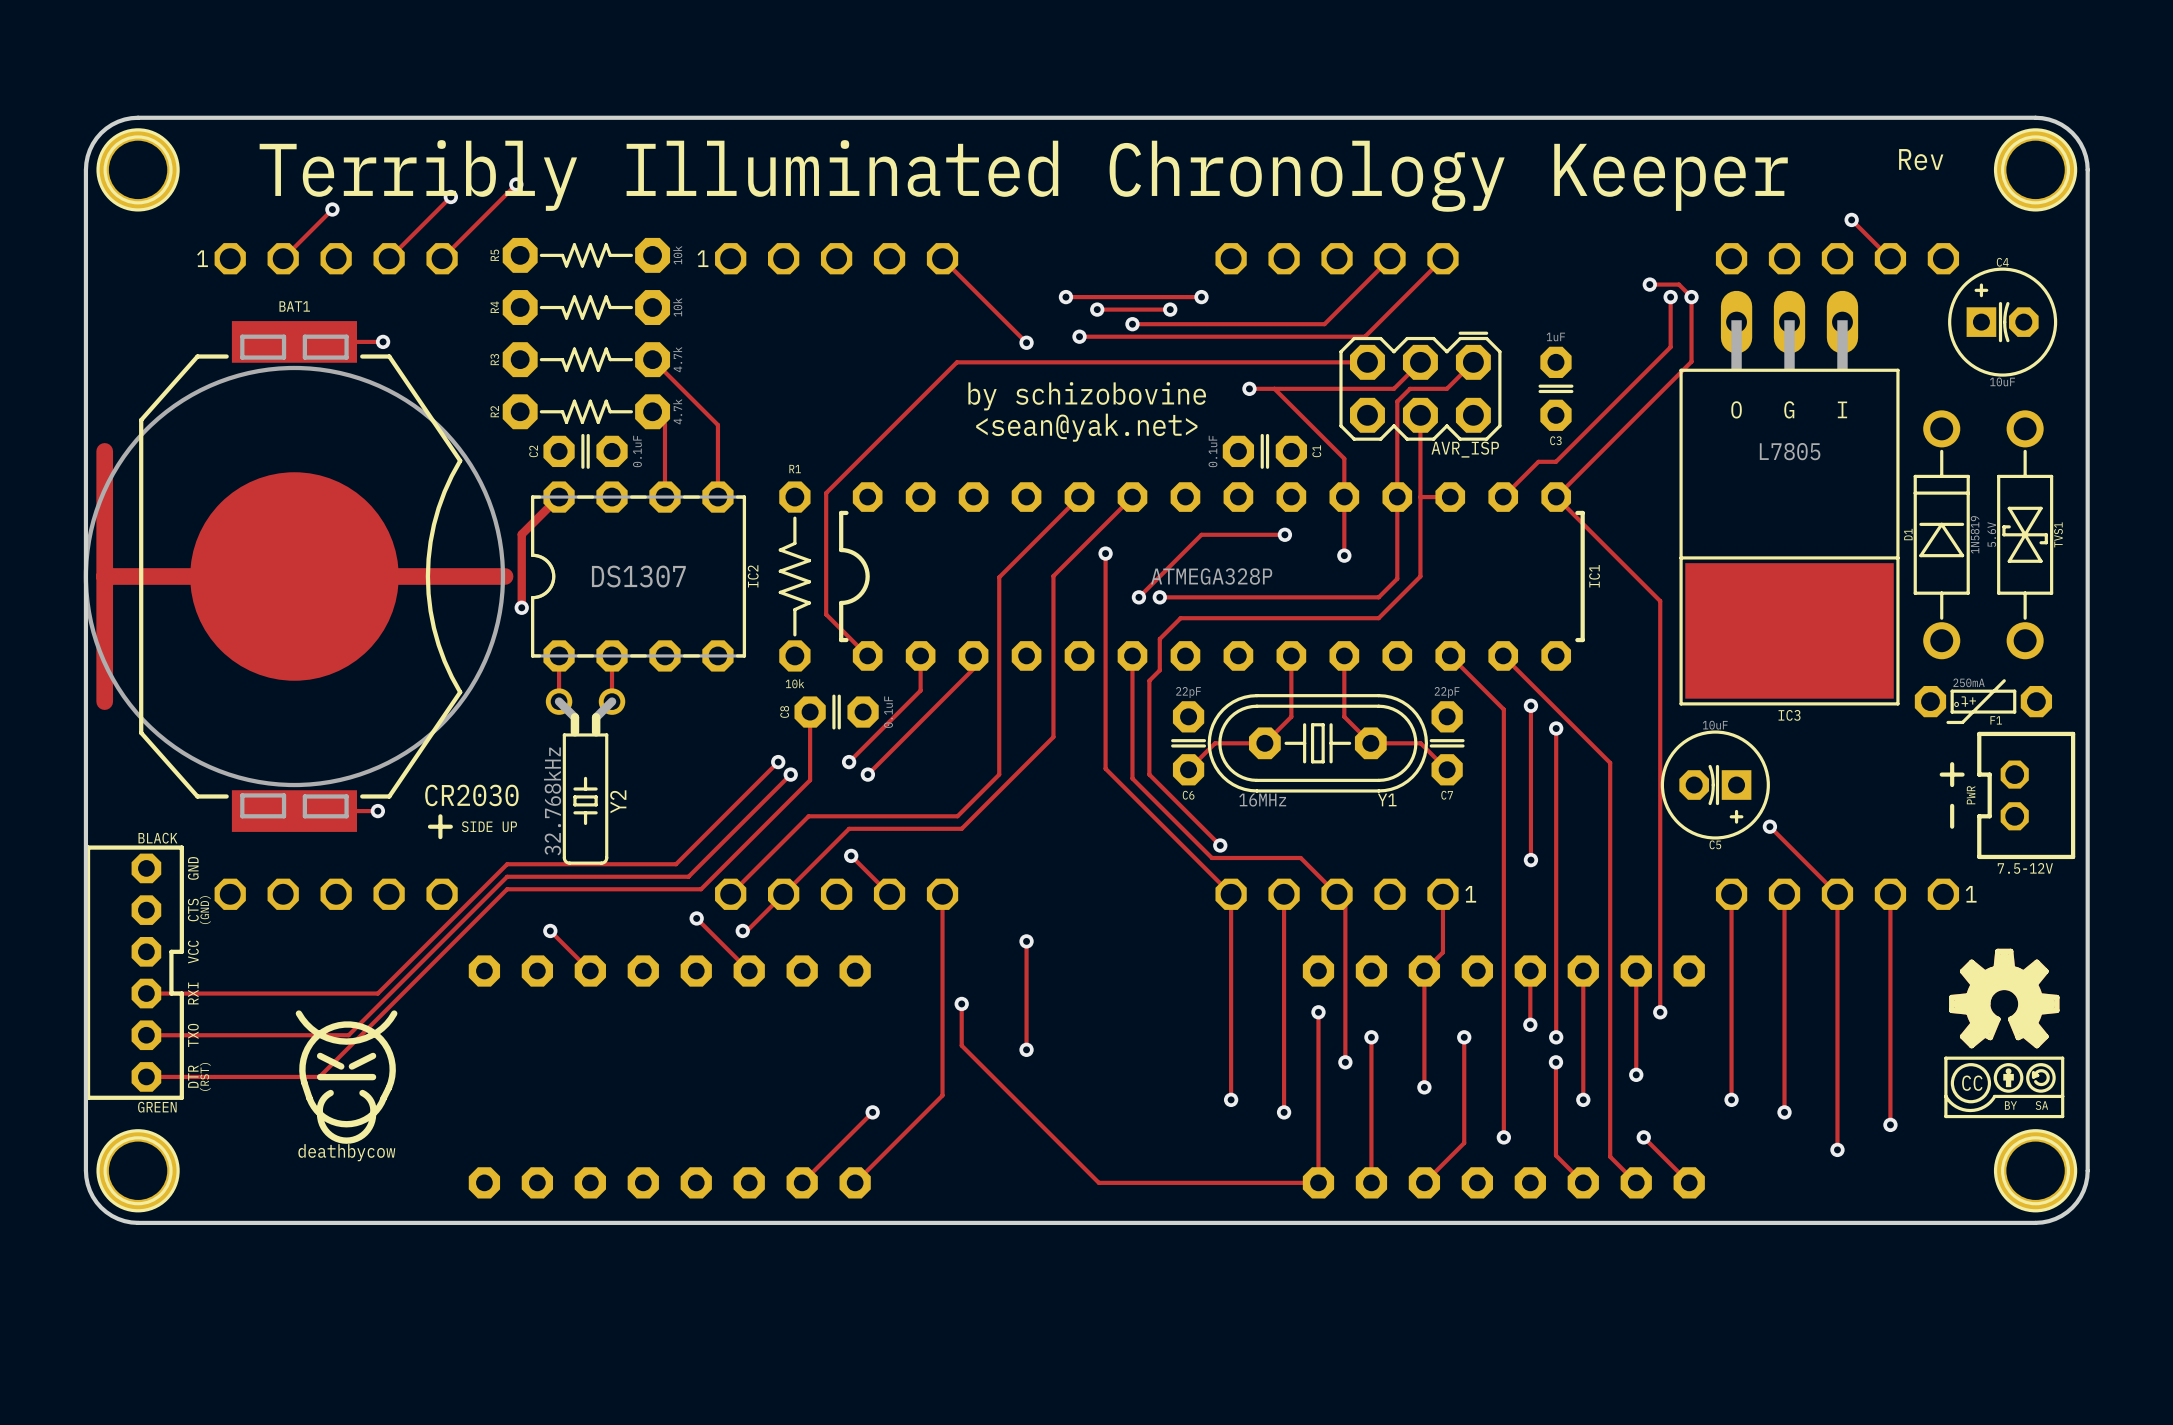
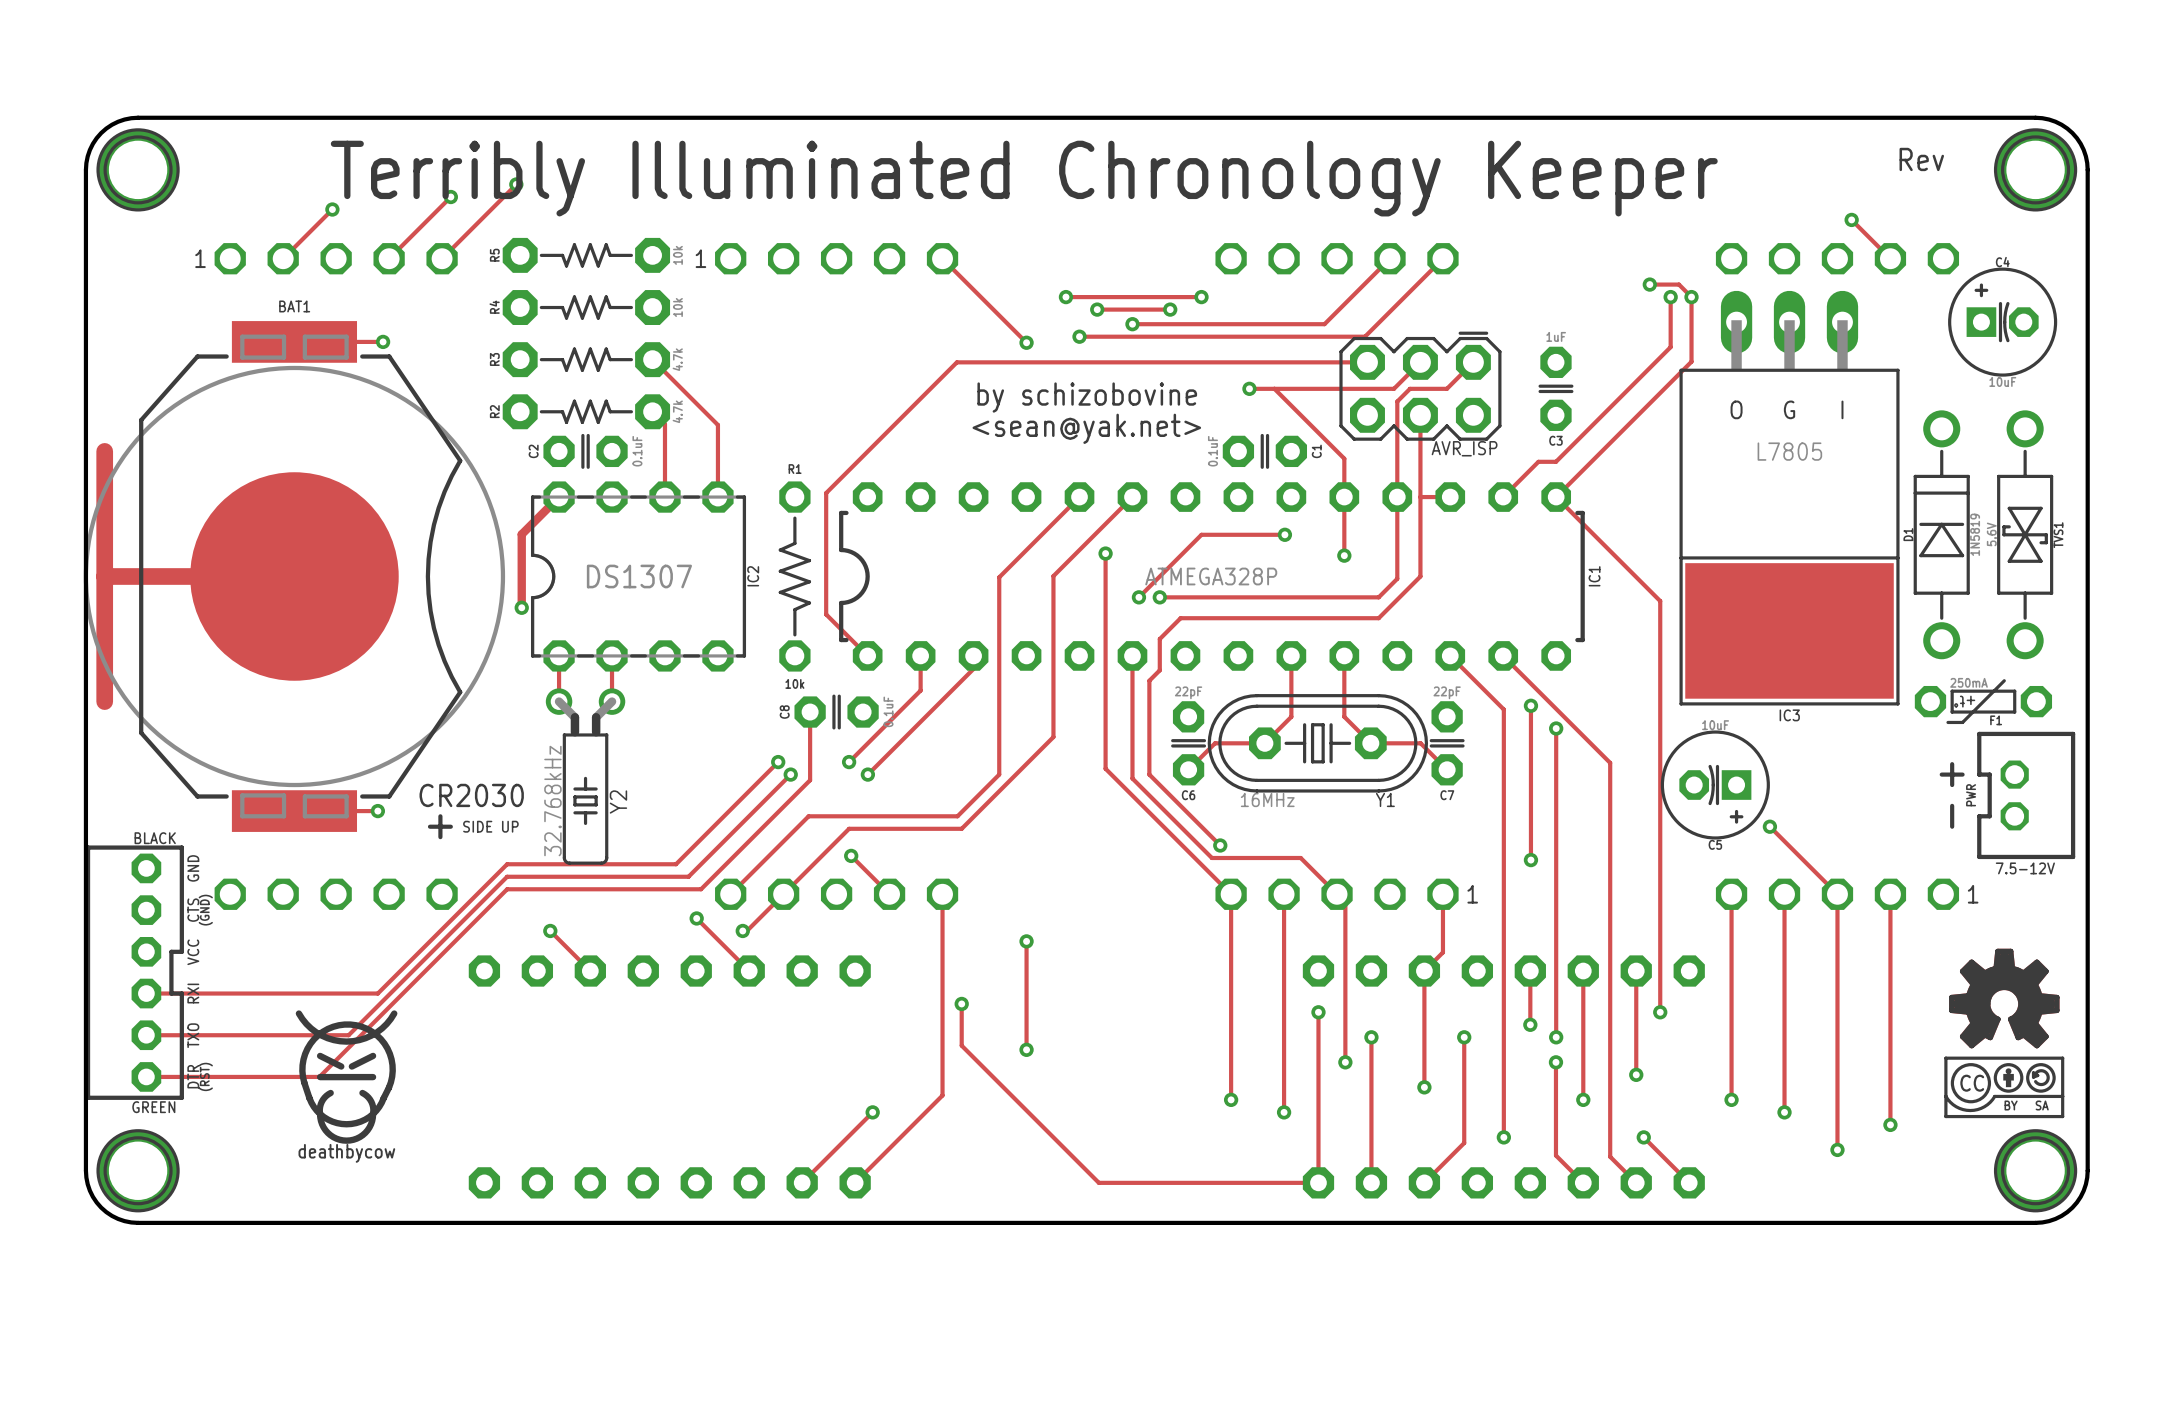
track: (294, 576) (505, 576) -> none

